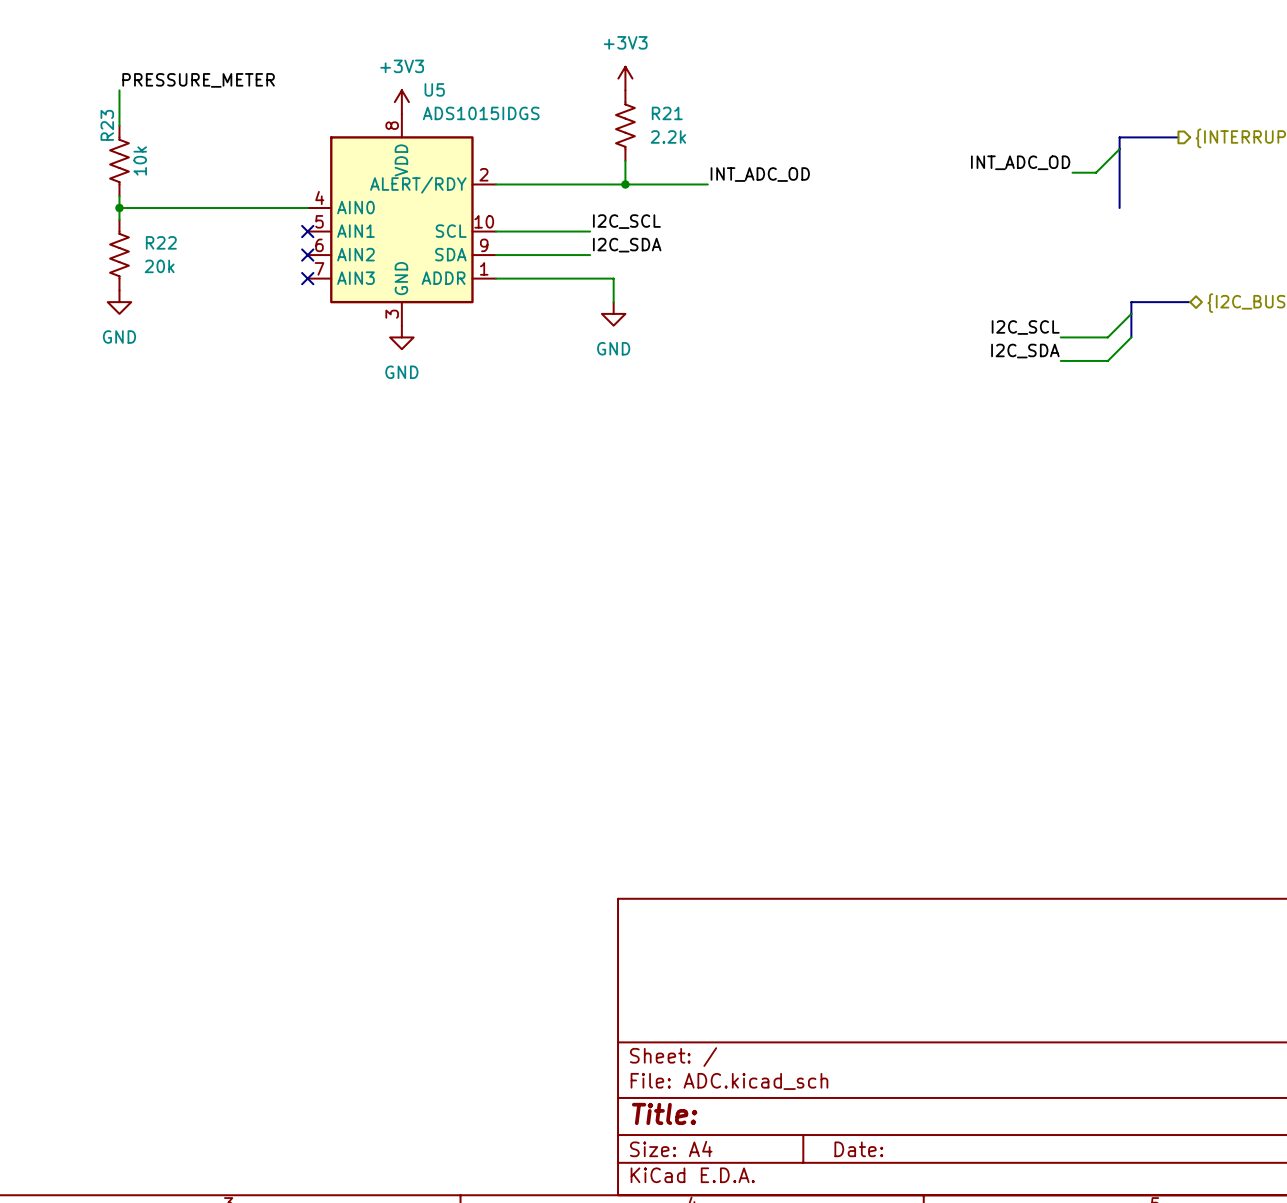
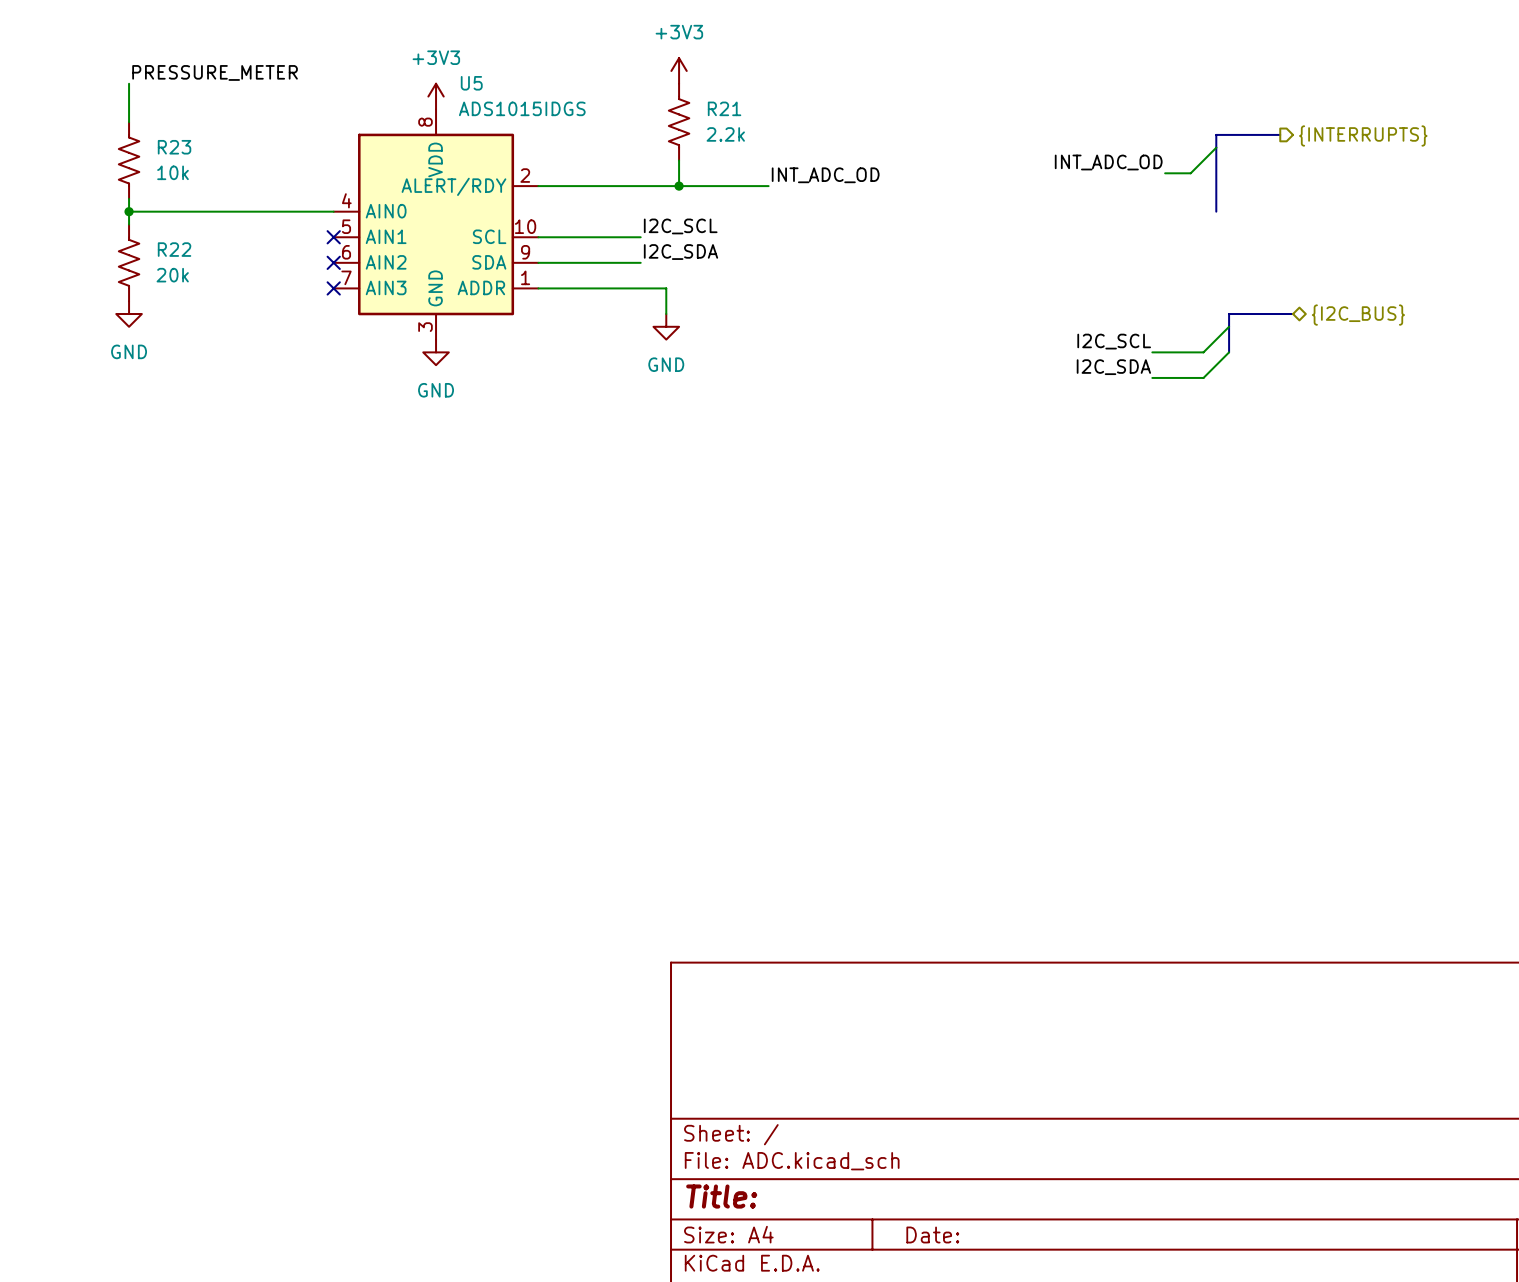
R23 name rotation: 0° (107, 125) -> 90° clockwise (174, 147)
R23 name position: R23 (107, 125) -> R23 (174, 147)
R23 value rotation: 0° (140, 160) -> 90° clockwise (173, 172)

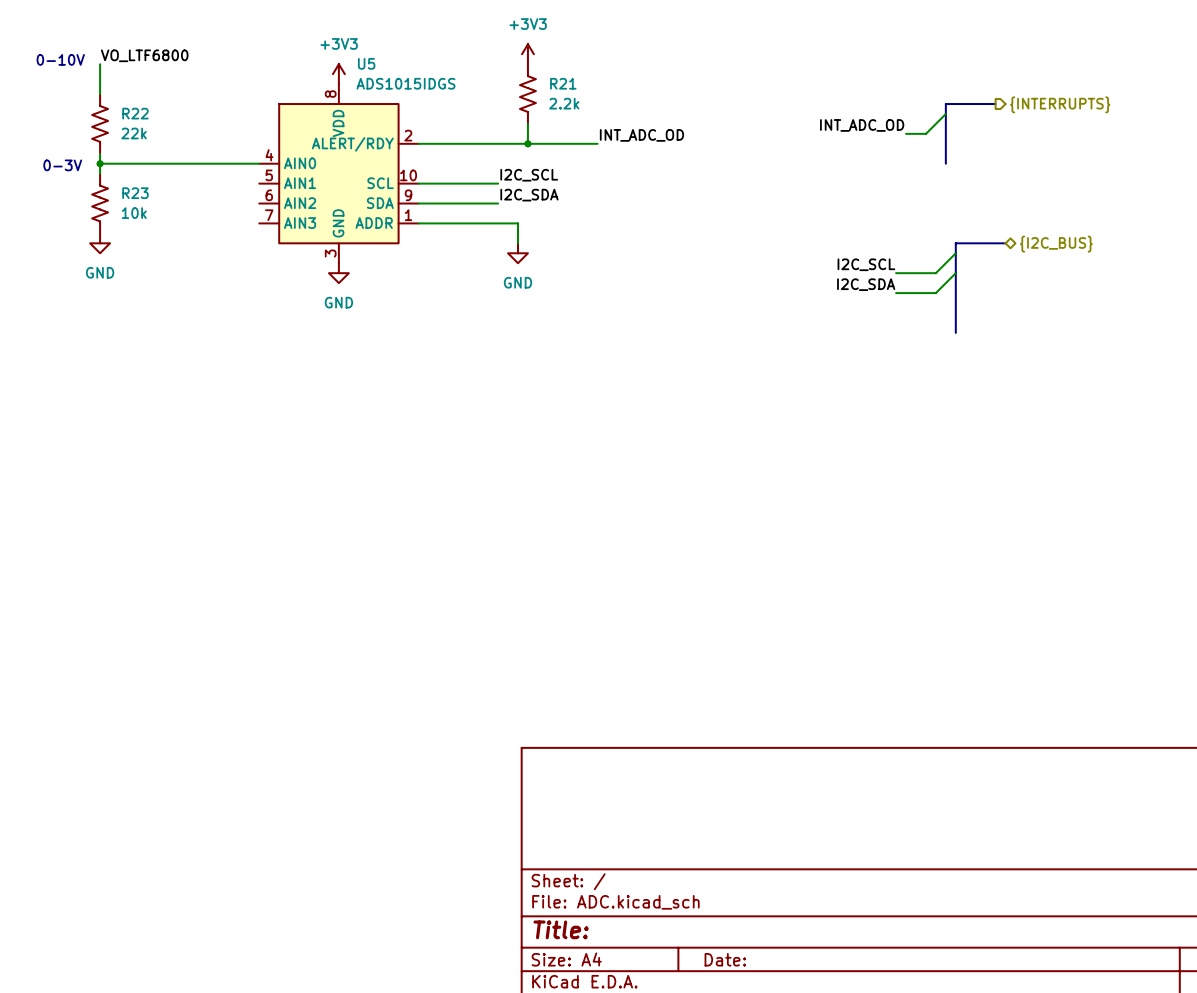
label: PRESSURE_METER (215, 72) -> VO_LTF6800 (144, 55)
text: none -> 0-10V (60, 59)
R23 name: R23 (174, 147) -> R22 (135, 113)
R23 value: 10k (173, 172) -> 22k (134, 133)
text: none -> 0-3V (62, 165)
no-connect mark: (333, 237) -> none
R22 name: R22 (174, 249) -> R23 (135, 193)
no-connect mark: (333, 262) -> none
R22 value: 20k (172, 275) -> 10k (134, 213)
no-connect mark: (333, 288) -> none
bus: none -> (955, 273) (955, 332)

